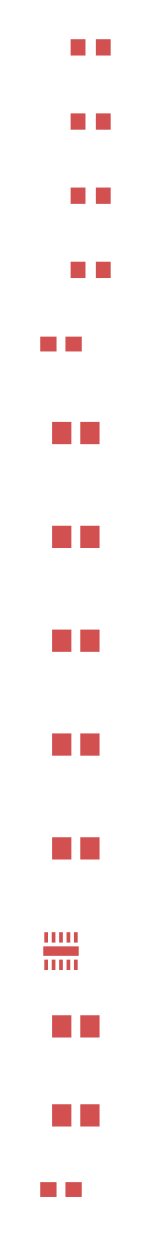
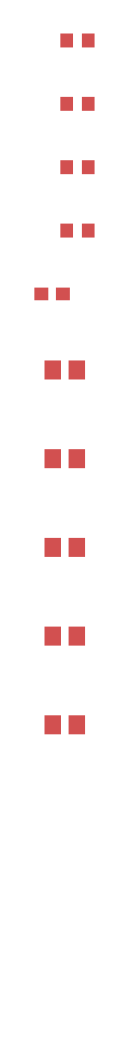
part: (60, 951) -> none
part: (75, 1026) -> none
part: (75, 1115) -> none
part: (60, 1189) -> none

